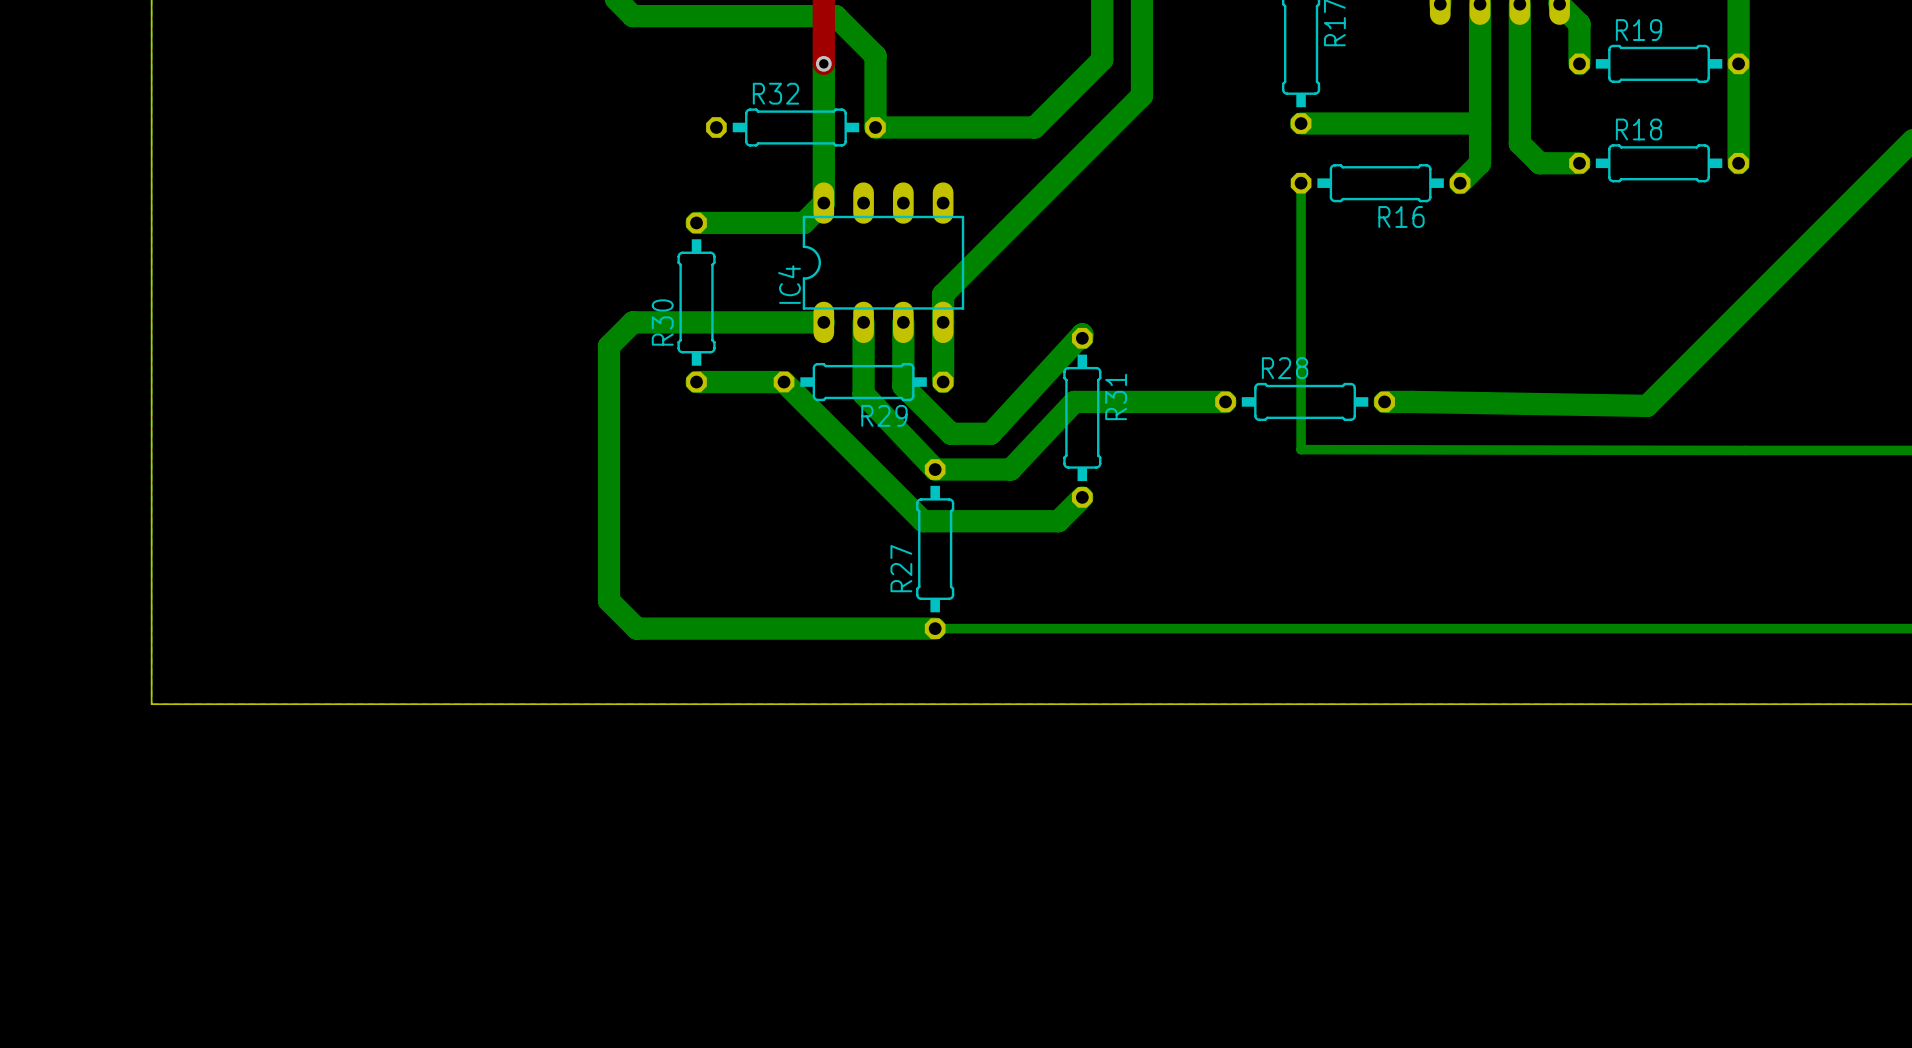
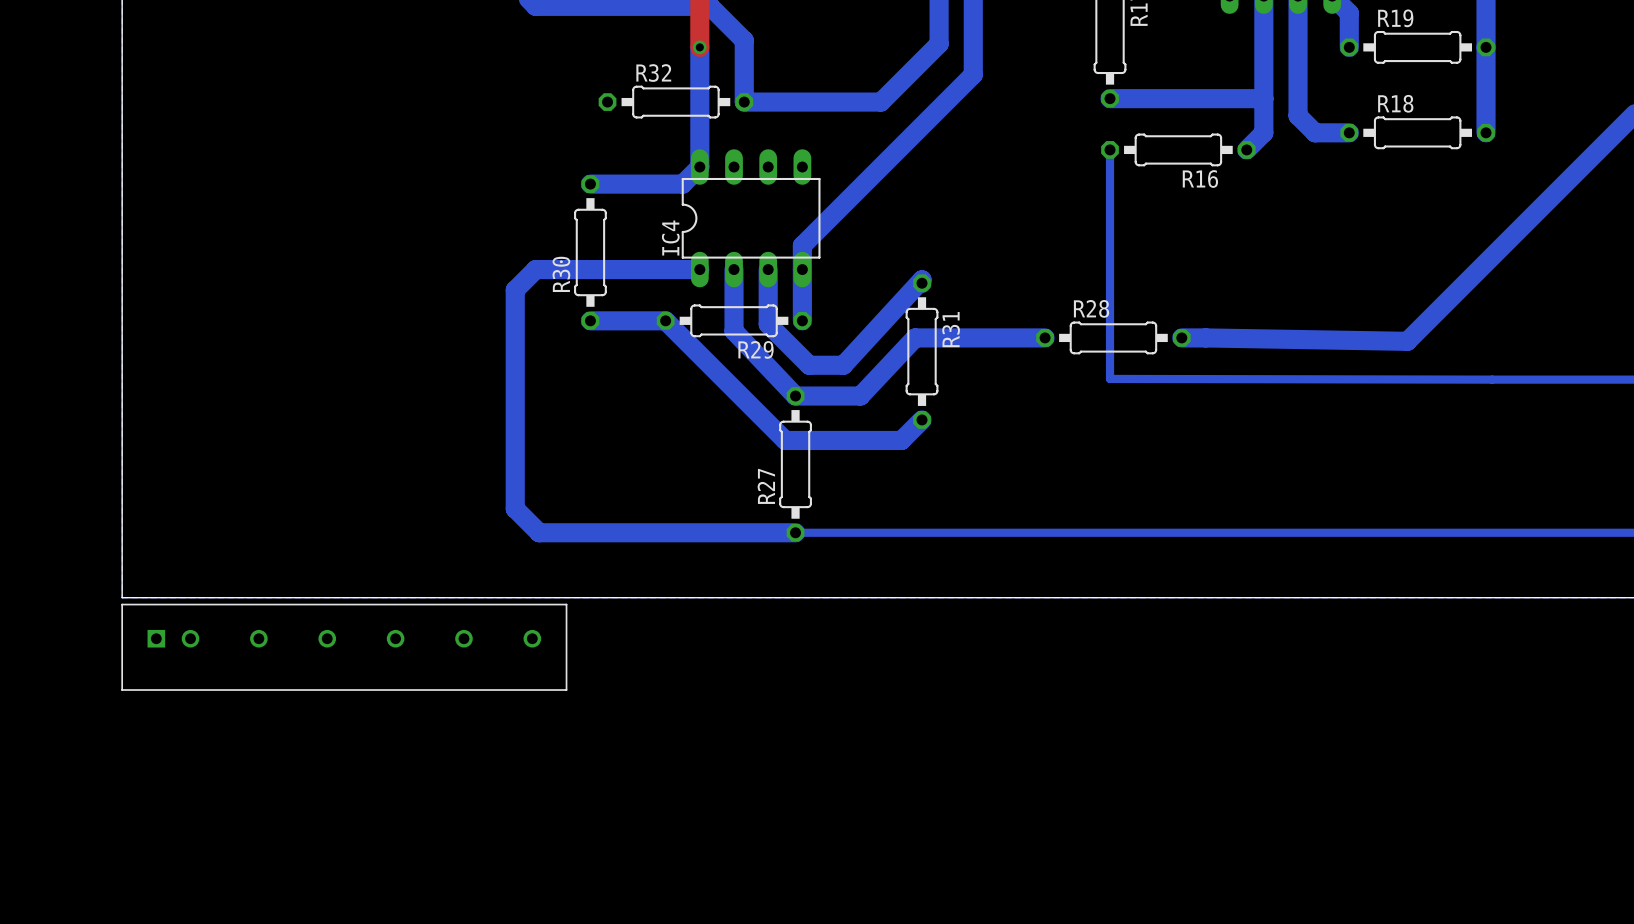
part: none -> (344, 647)

